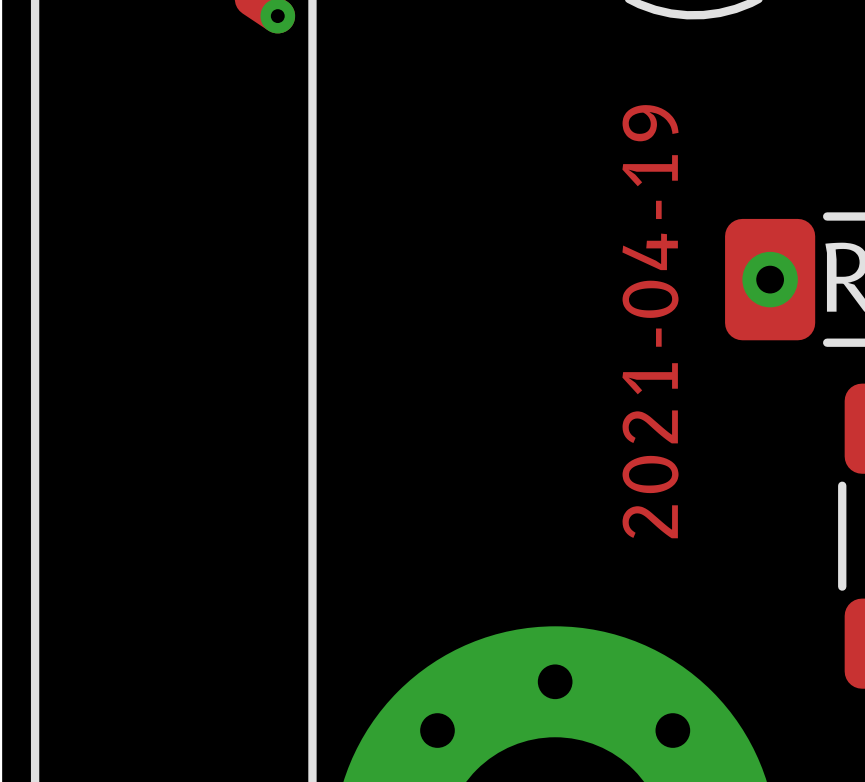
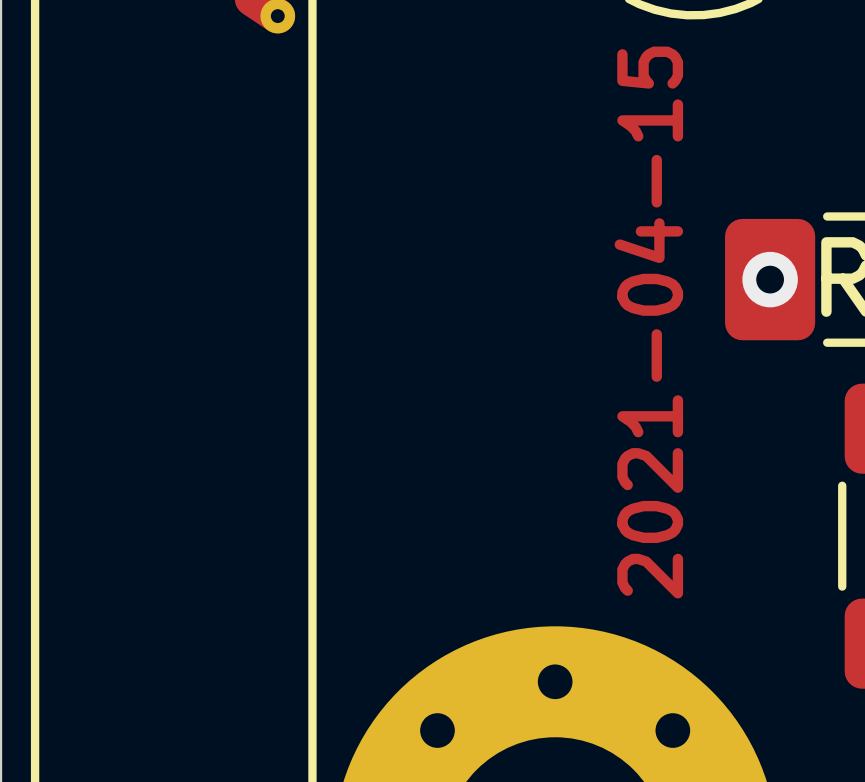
text: 2021-04-19 (650, 321) -> 2021-04-15 (648, 322)

